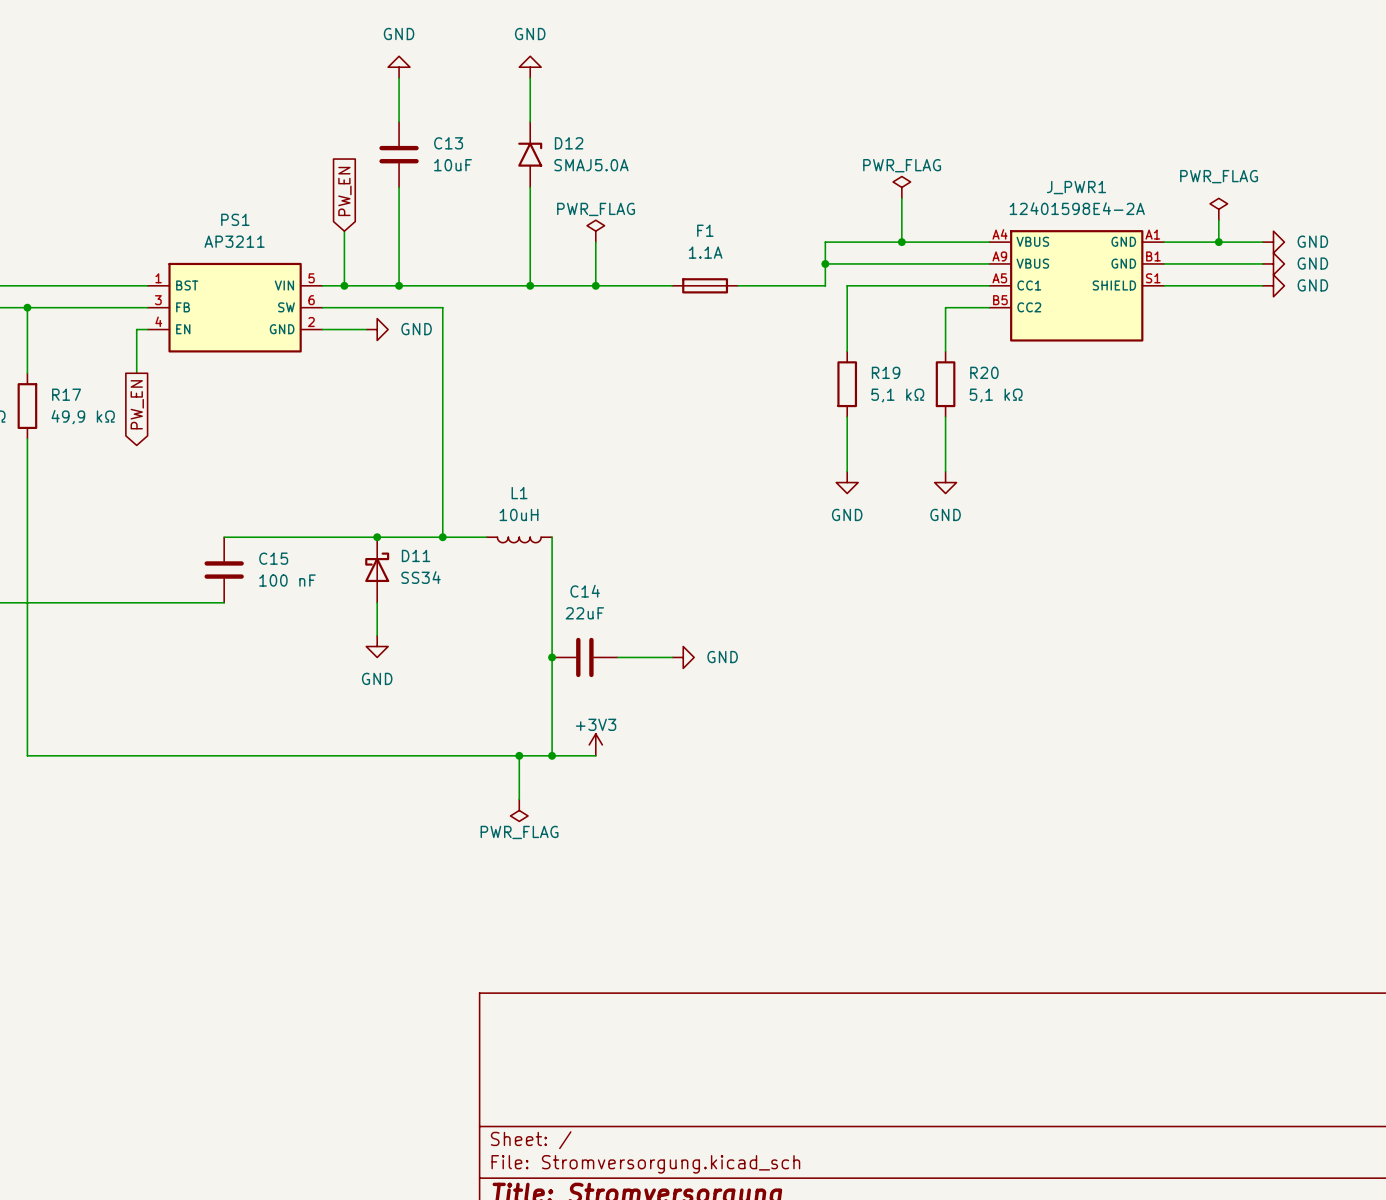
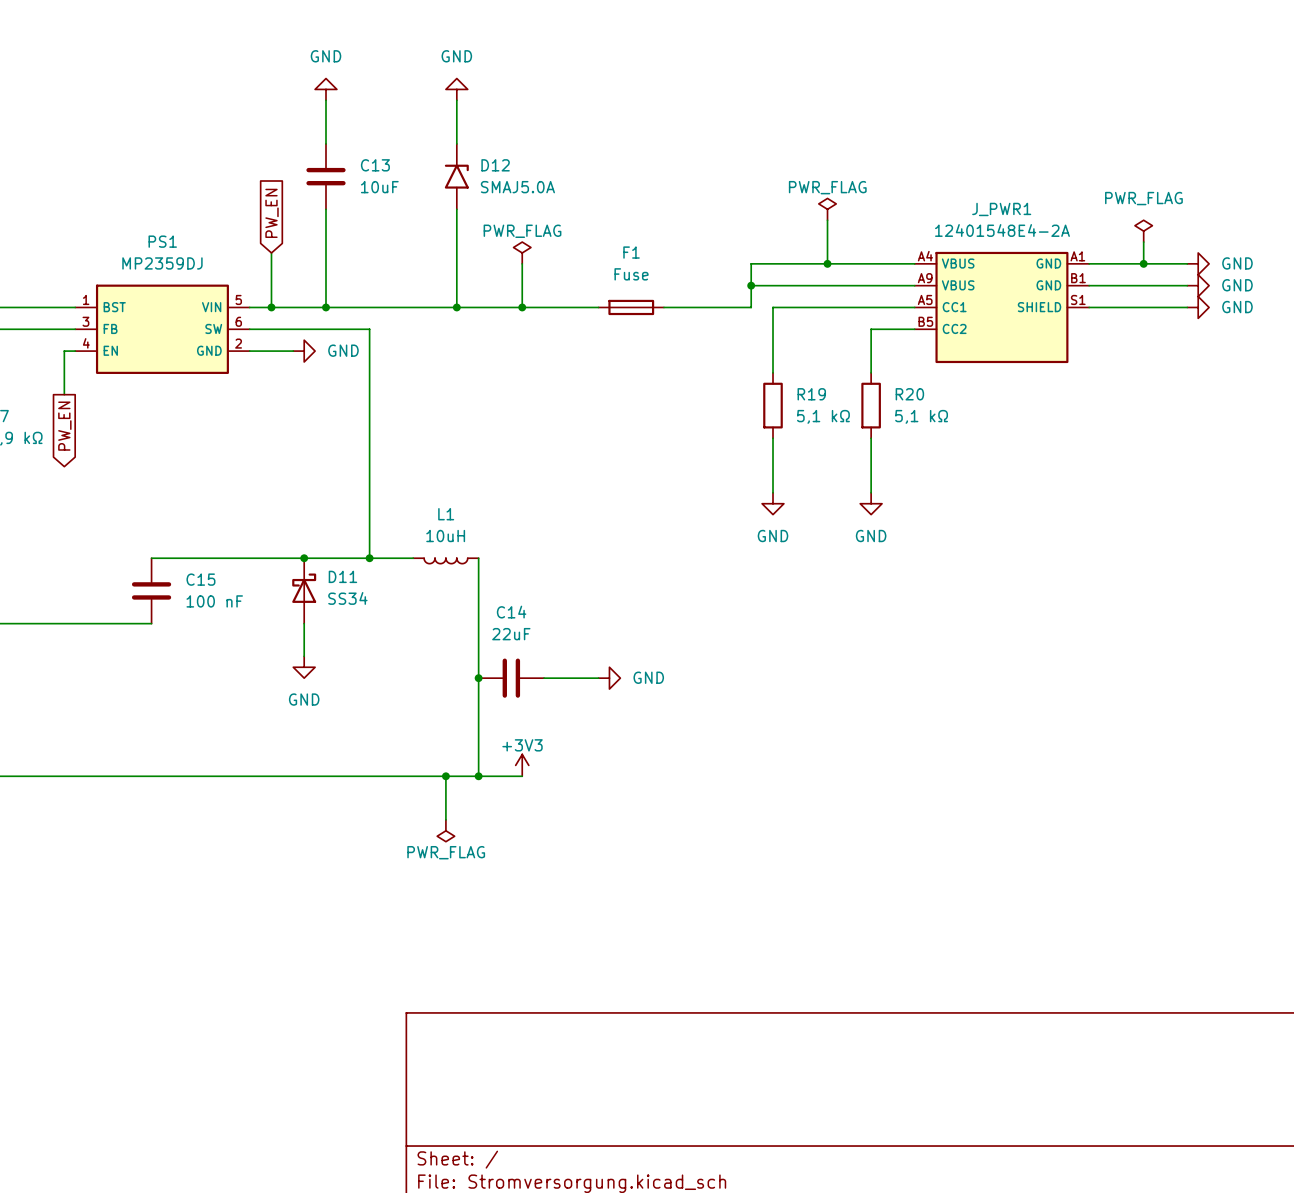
J_PWR1 value: 12401598E4-2A (1077, 208) -> 12401548E4-2A (1002, 230)
PS1 value: AP3211 (234, 241) -> MP2359DJ (162, 263)
F1 value: 1.1A (705, 252) -> Fuse (631, 274)

